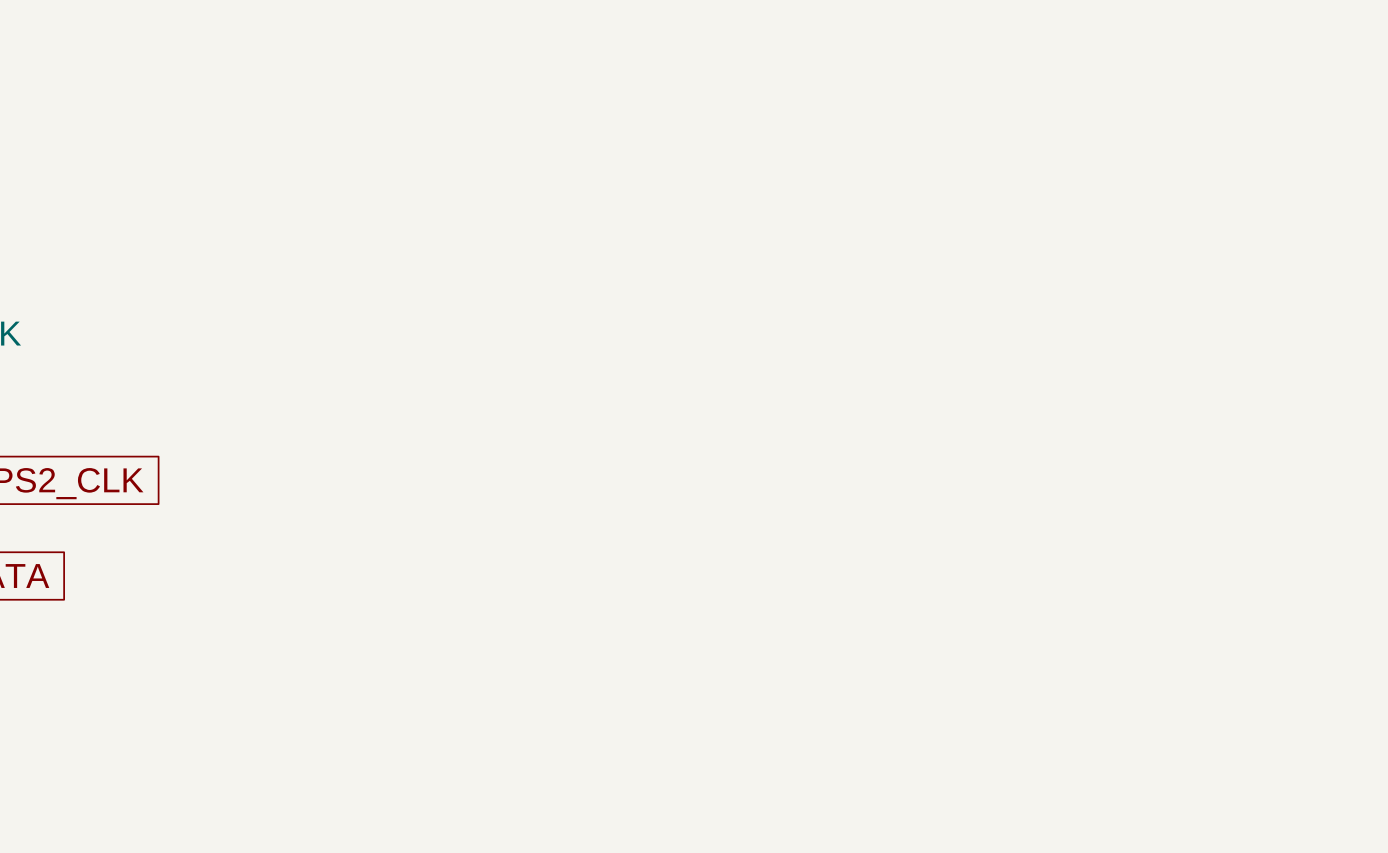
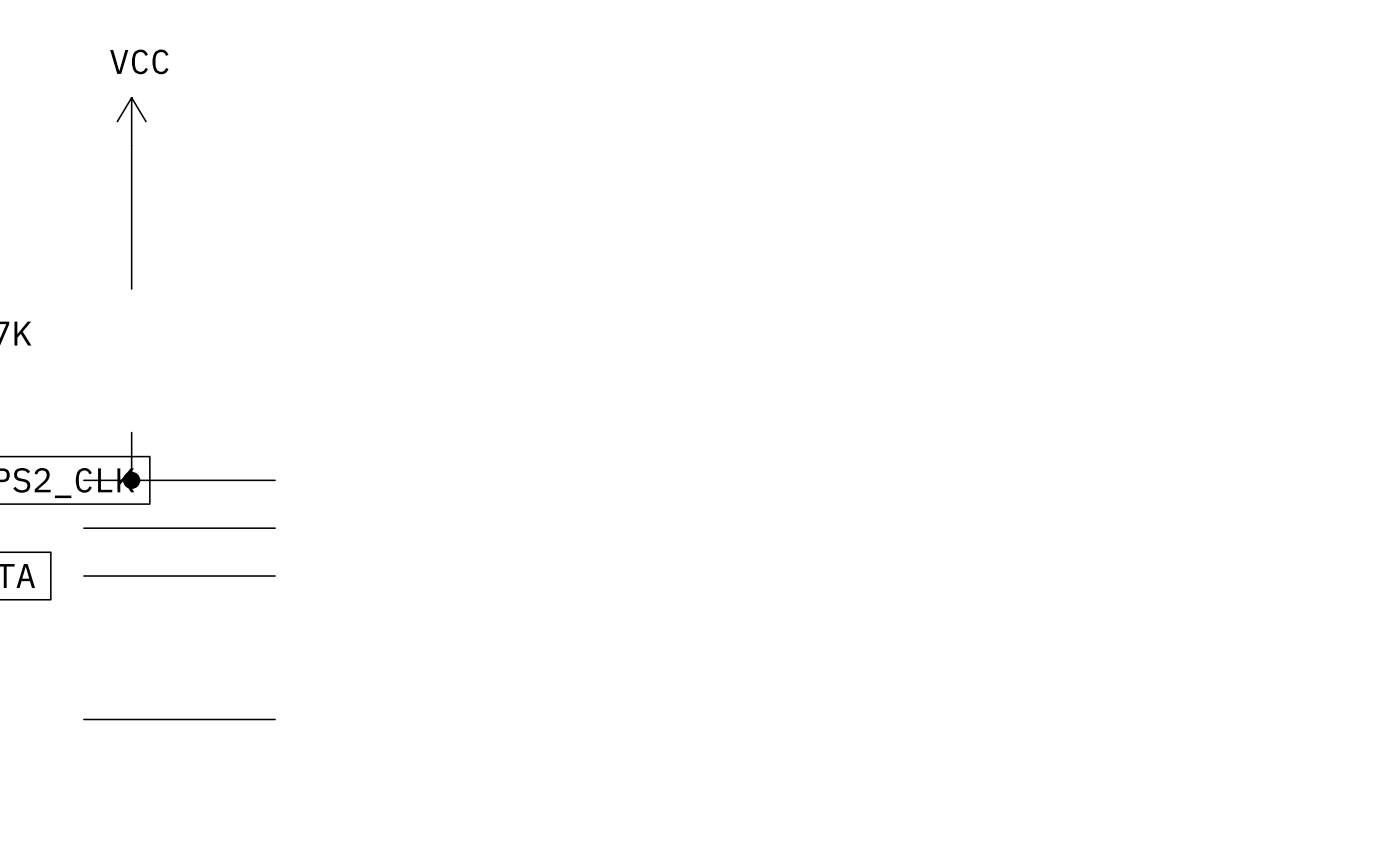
power symbol: none -> VCC (131, 121)
wire: none -> (131, 145) (131, 289)
wire: none -> (131, 432) (131, 480)
wire: none -> (83, 480) (275, 480)
junction: none -> (131, 480)
wire: none -> (83, 528) (275, 528)
wire: none -> (83, 576) (275, 576)
wire: none -> (83, 719) (275, 719)

